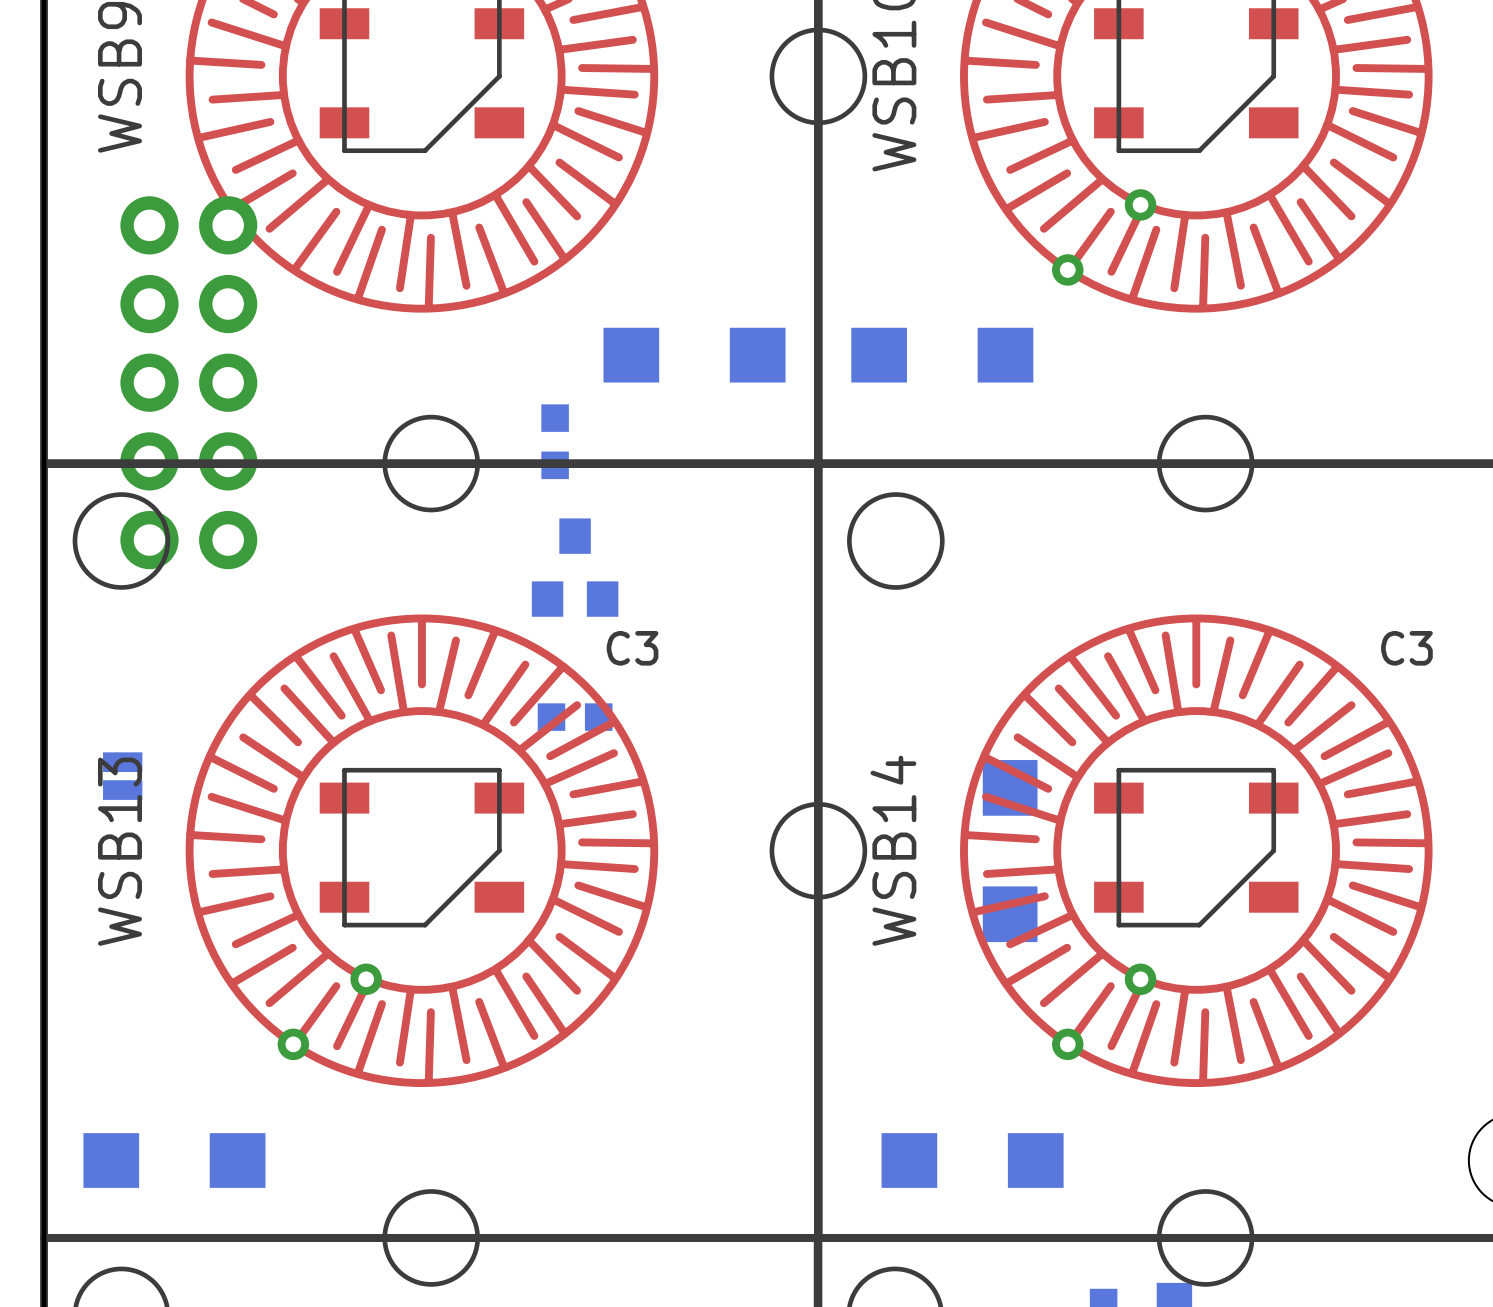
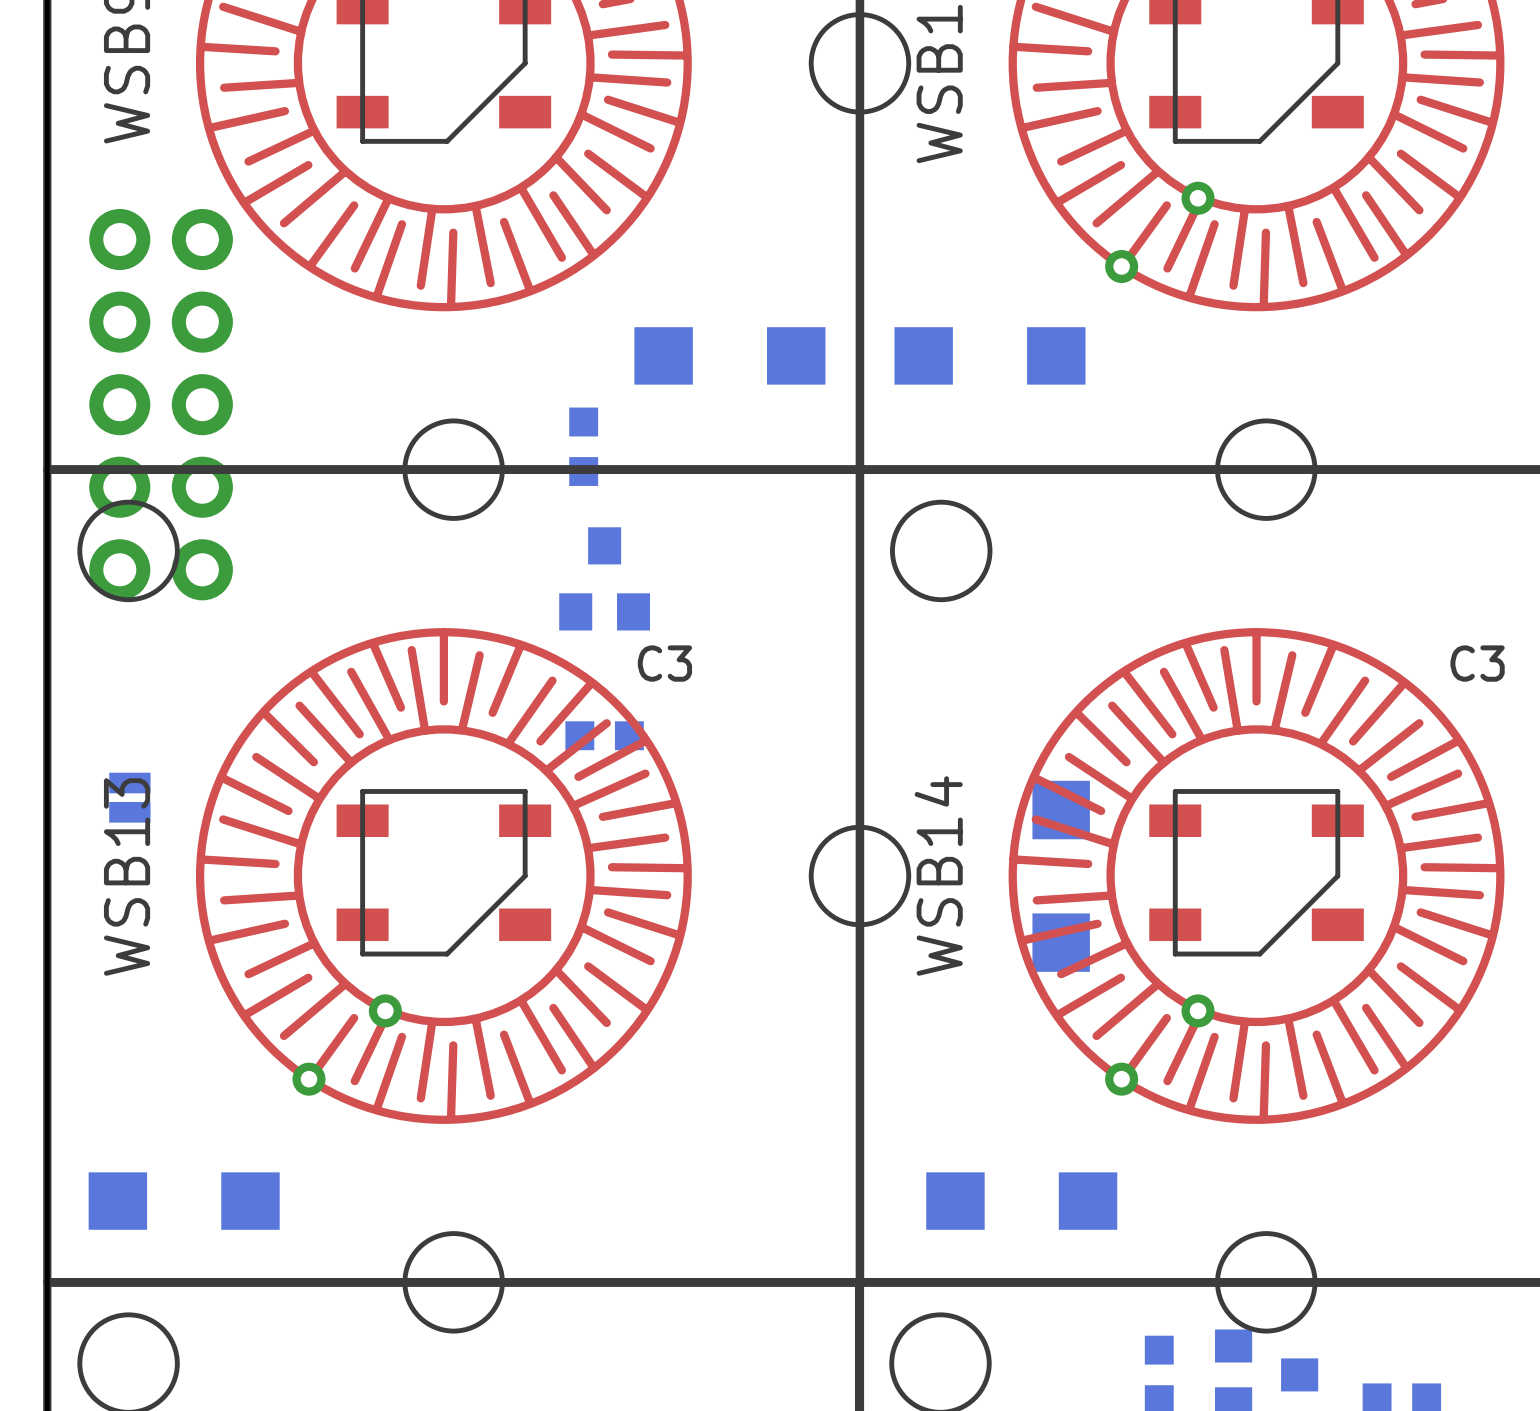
part position: (188, 382) -> (161, 404)

